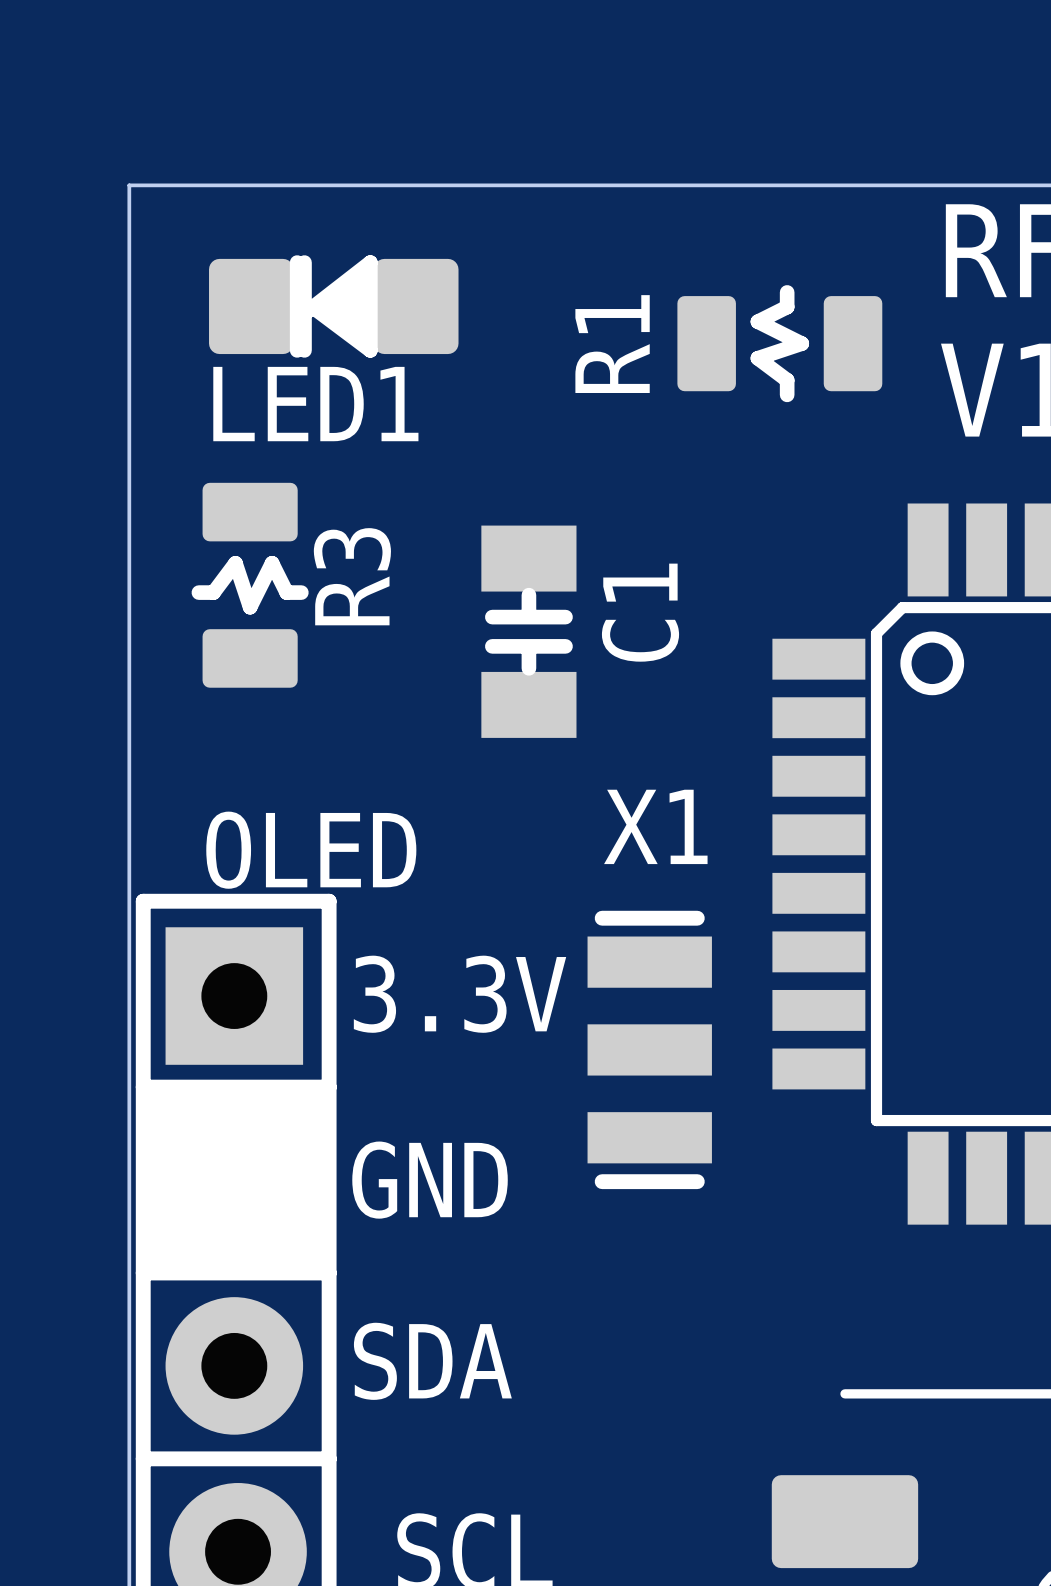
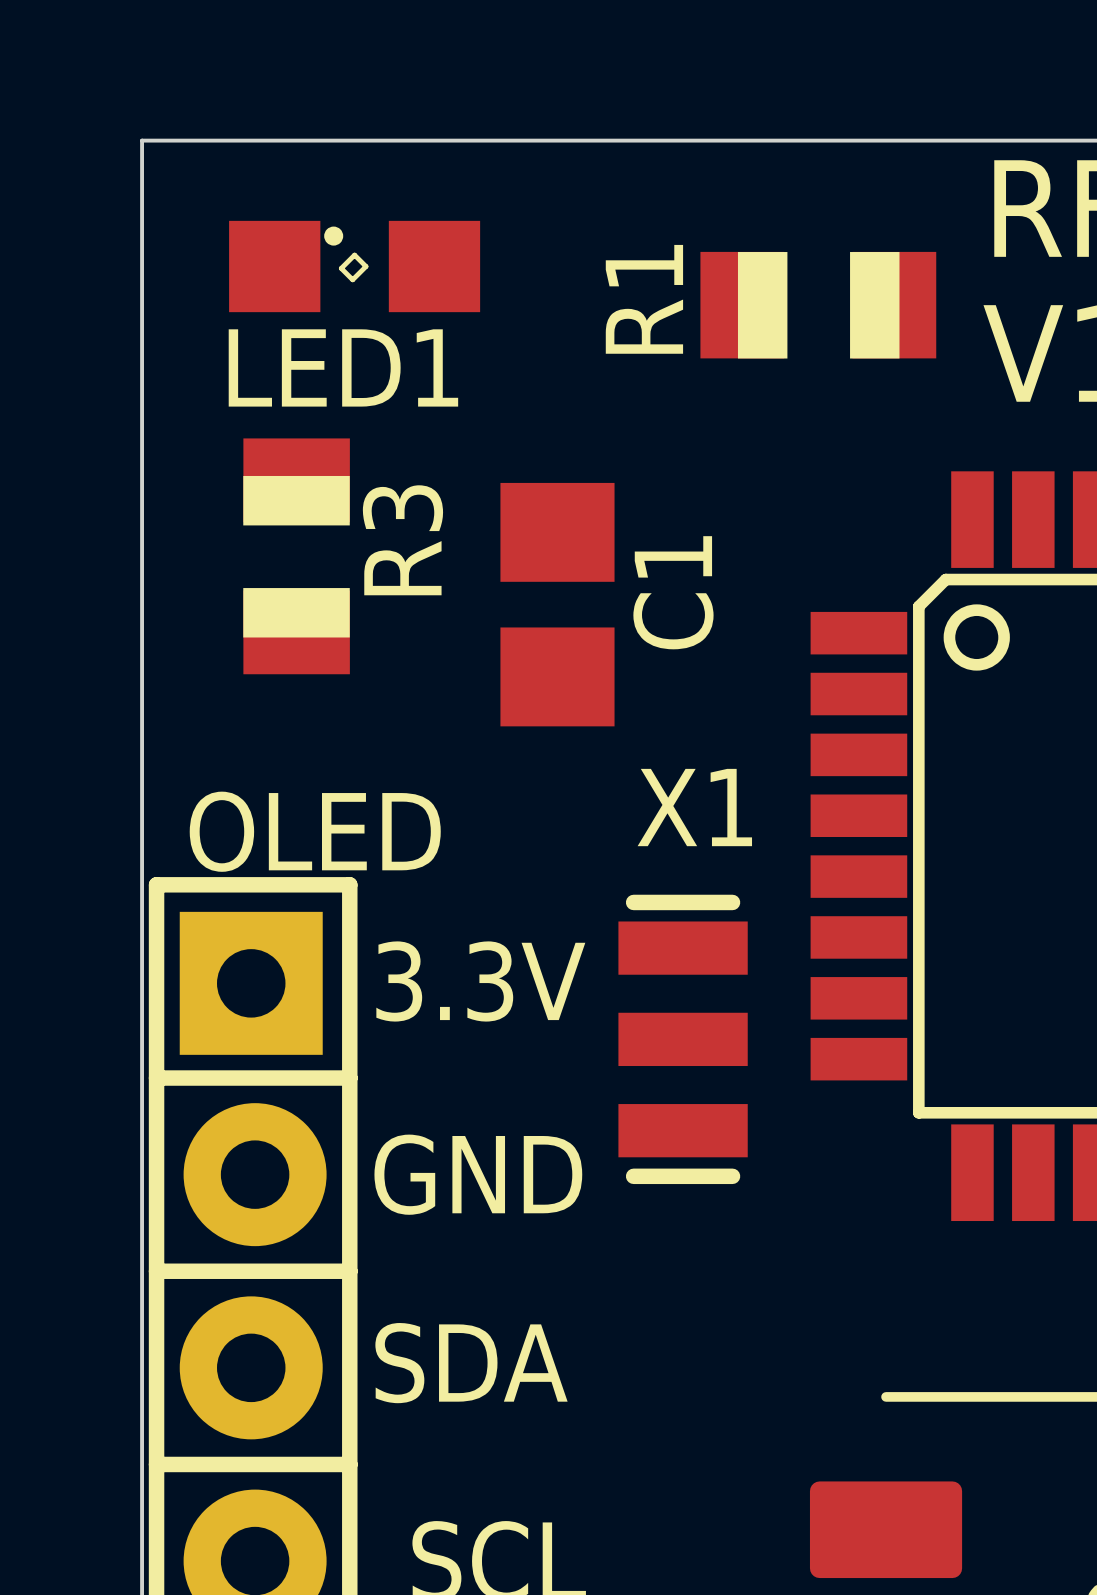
LED1 footprint: [209, 255, 459, 358] -> [229, 220, 481, 313]
R1 footprint: [677, 285, 883, 403] -> [700, 251, 937, 359]
R3 footprint: [191, 482, 309, 688] -> [243, 438, 350, 675]
C1 footprint: [481, 525, 577, 738] -> [500, 482, 615, 727]
drawing: [138, 1087, 334, 1273] -> none

